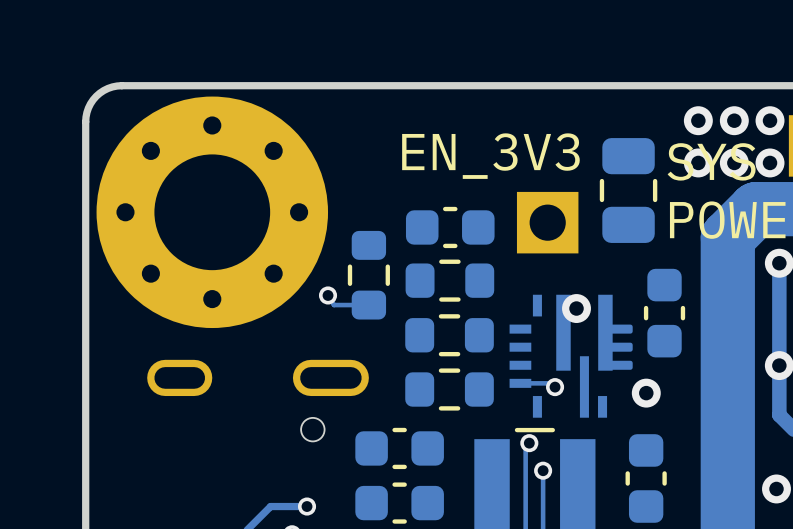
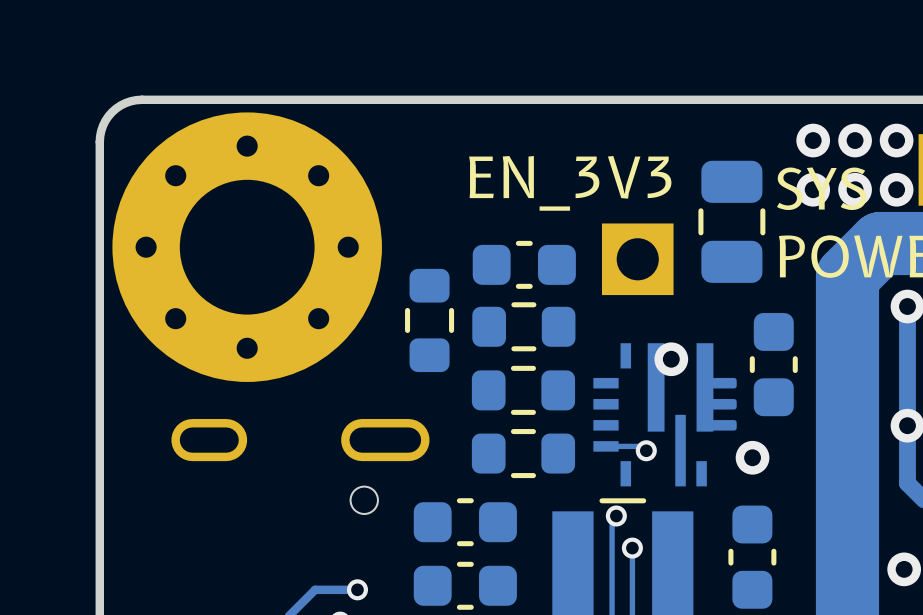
via: (328, 295) -> none
track: (328, 299) (328, 295) (333, 305) (368, 305) -> none

